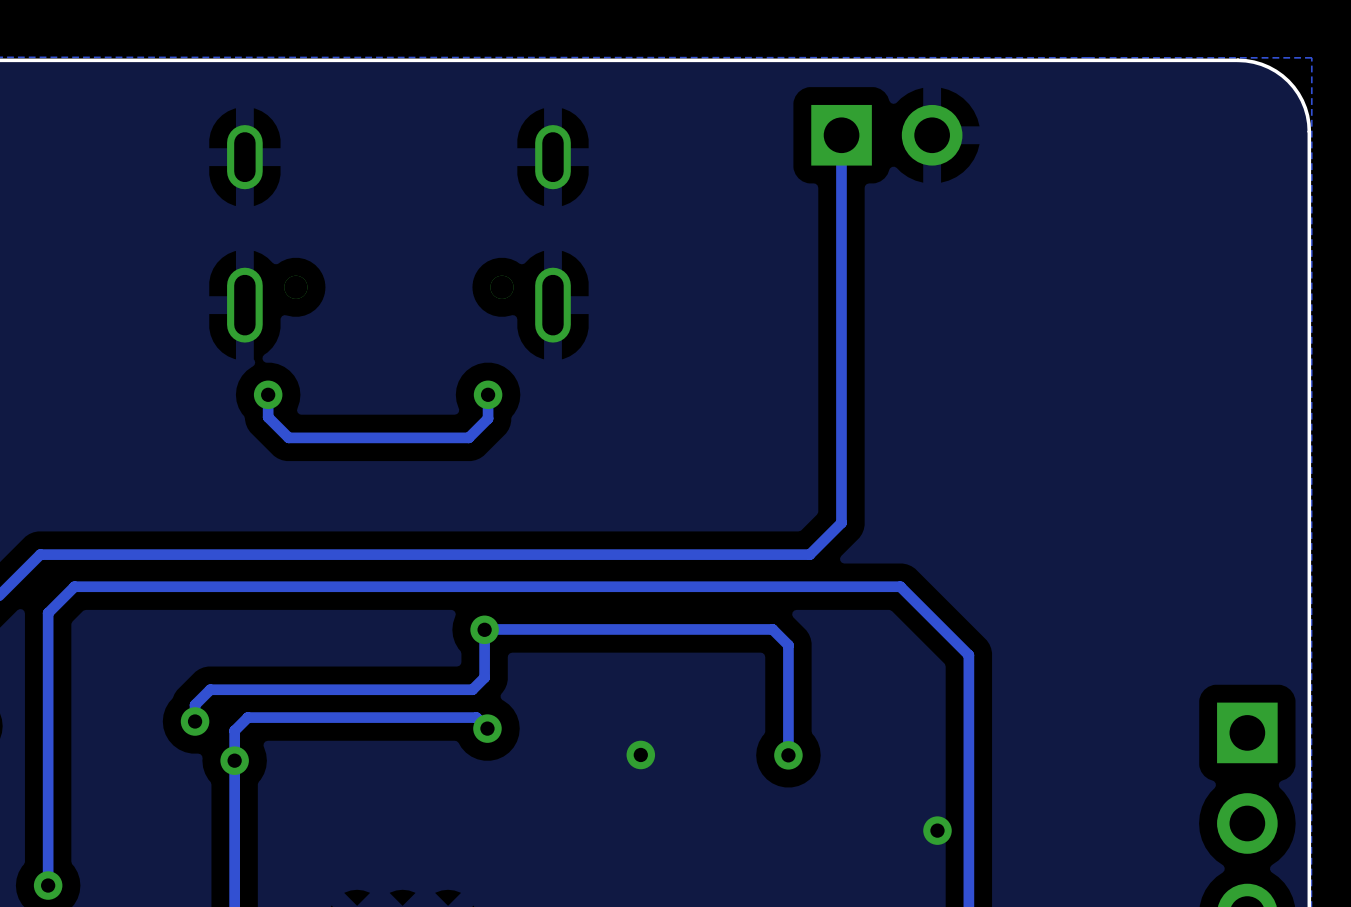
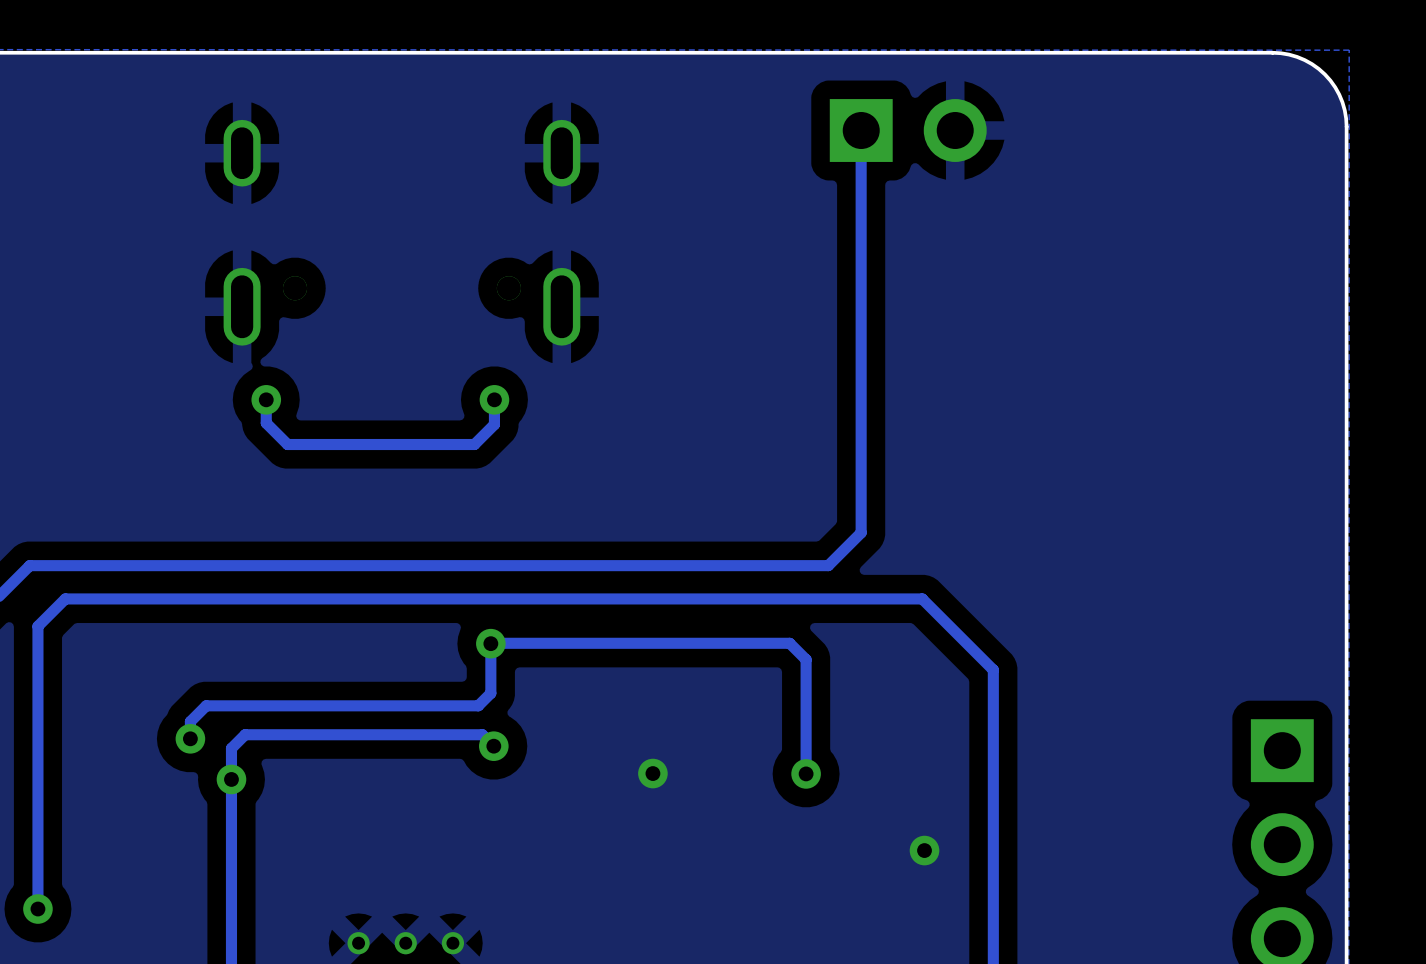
via position: (937, 830) -> (924, 850)

